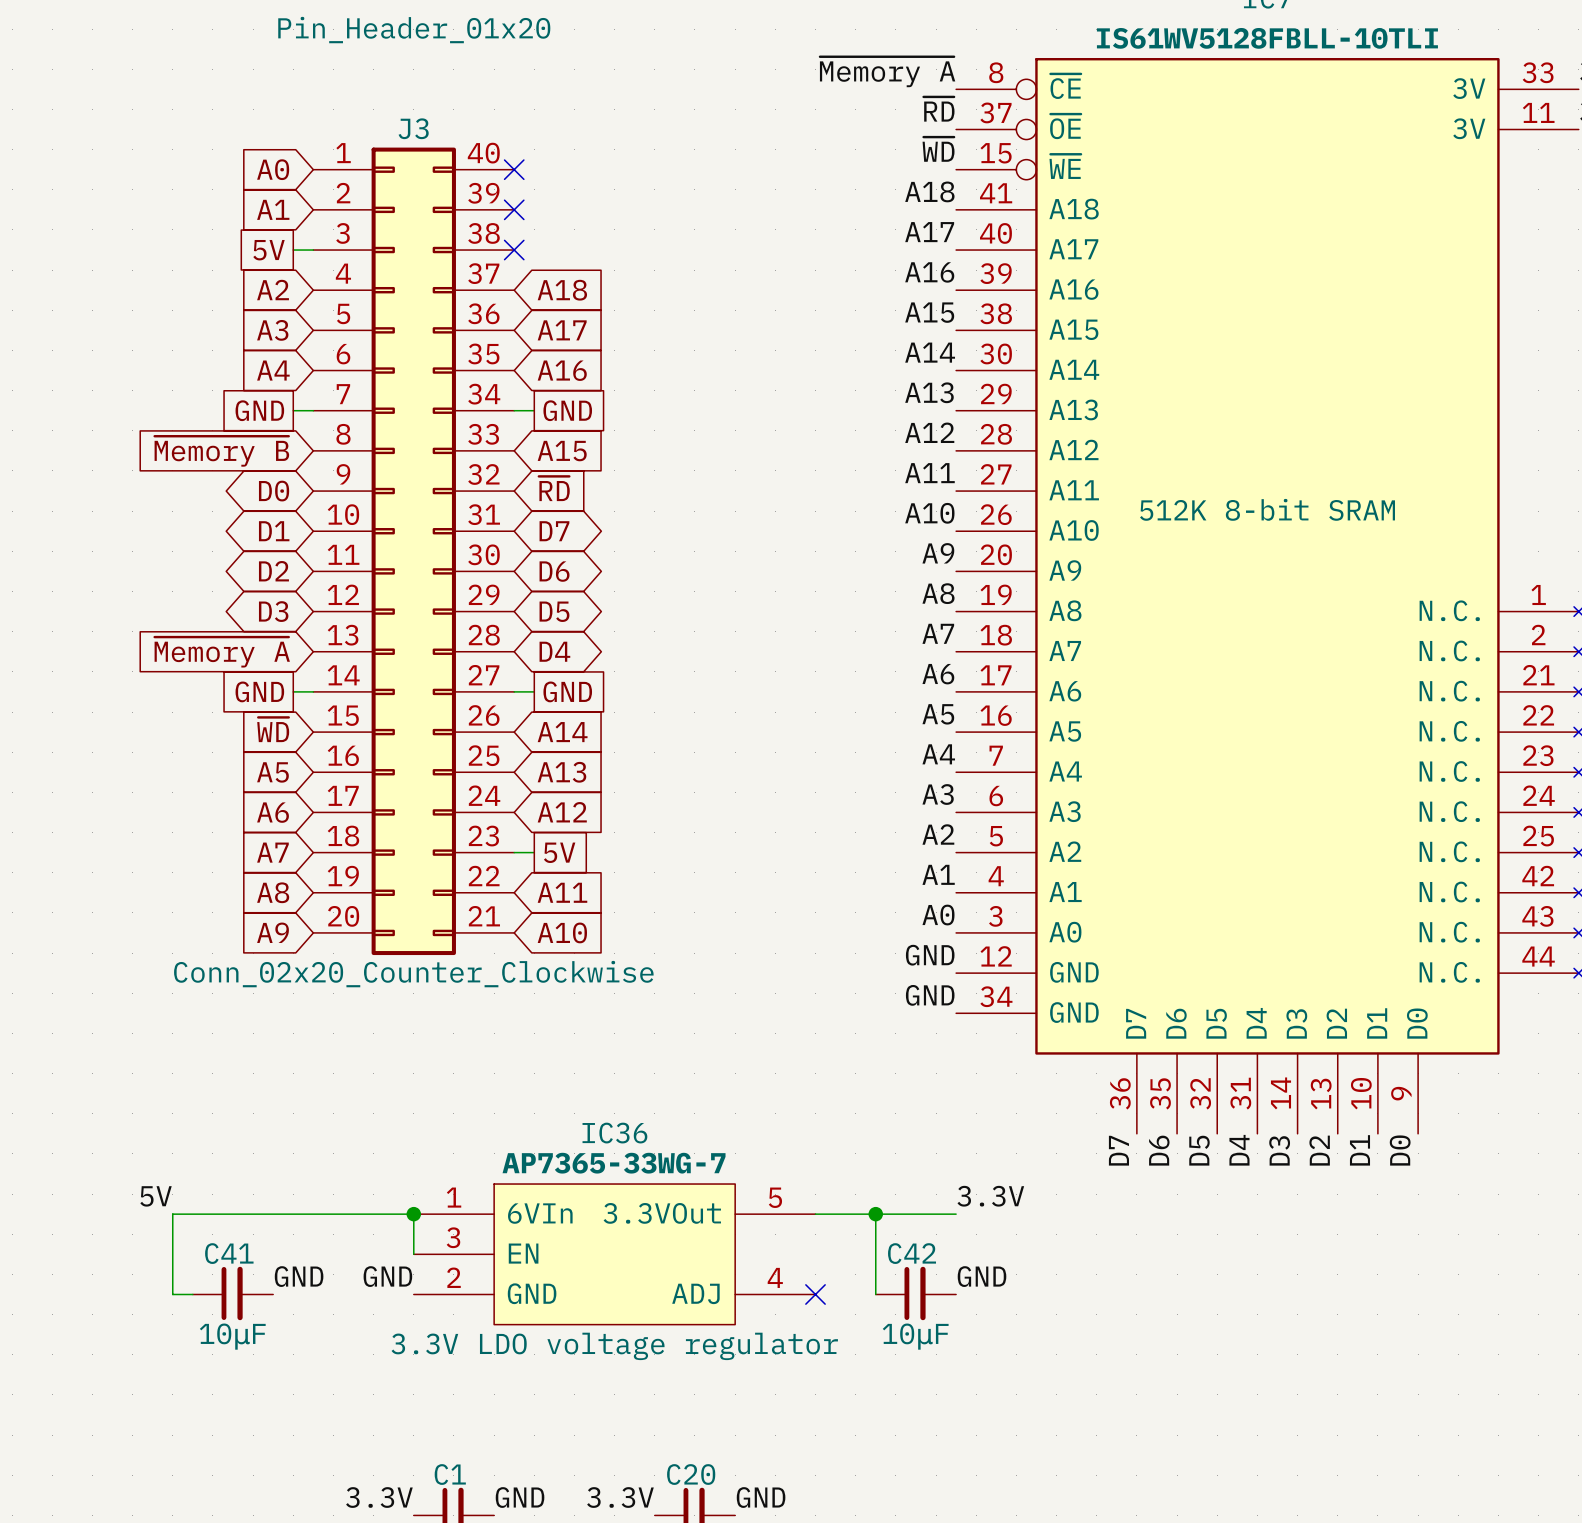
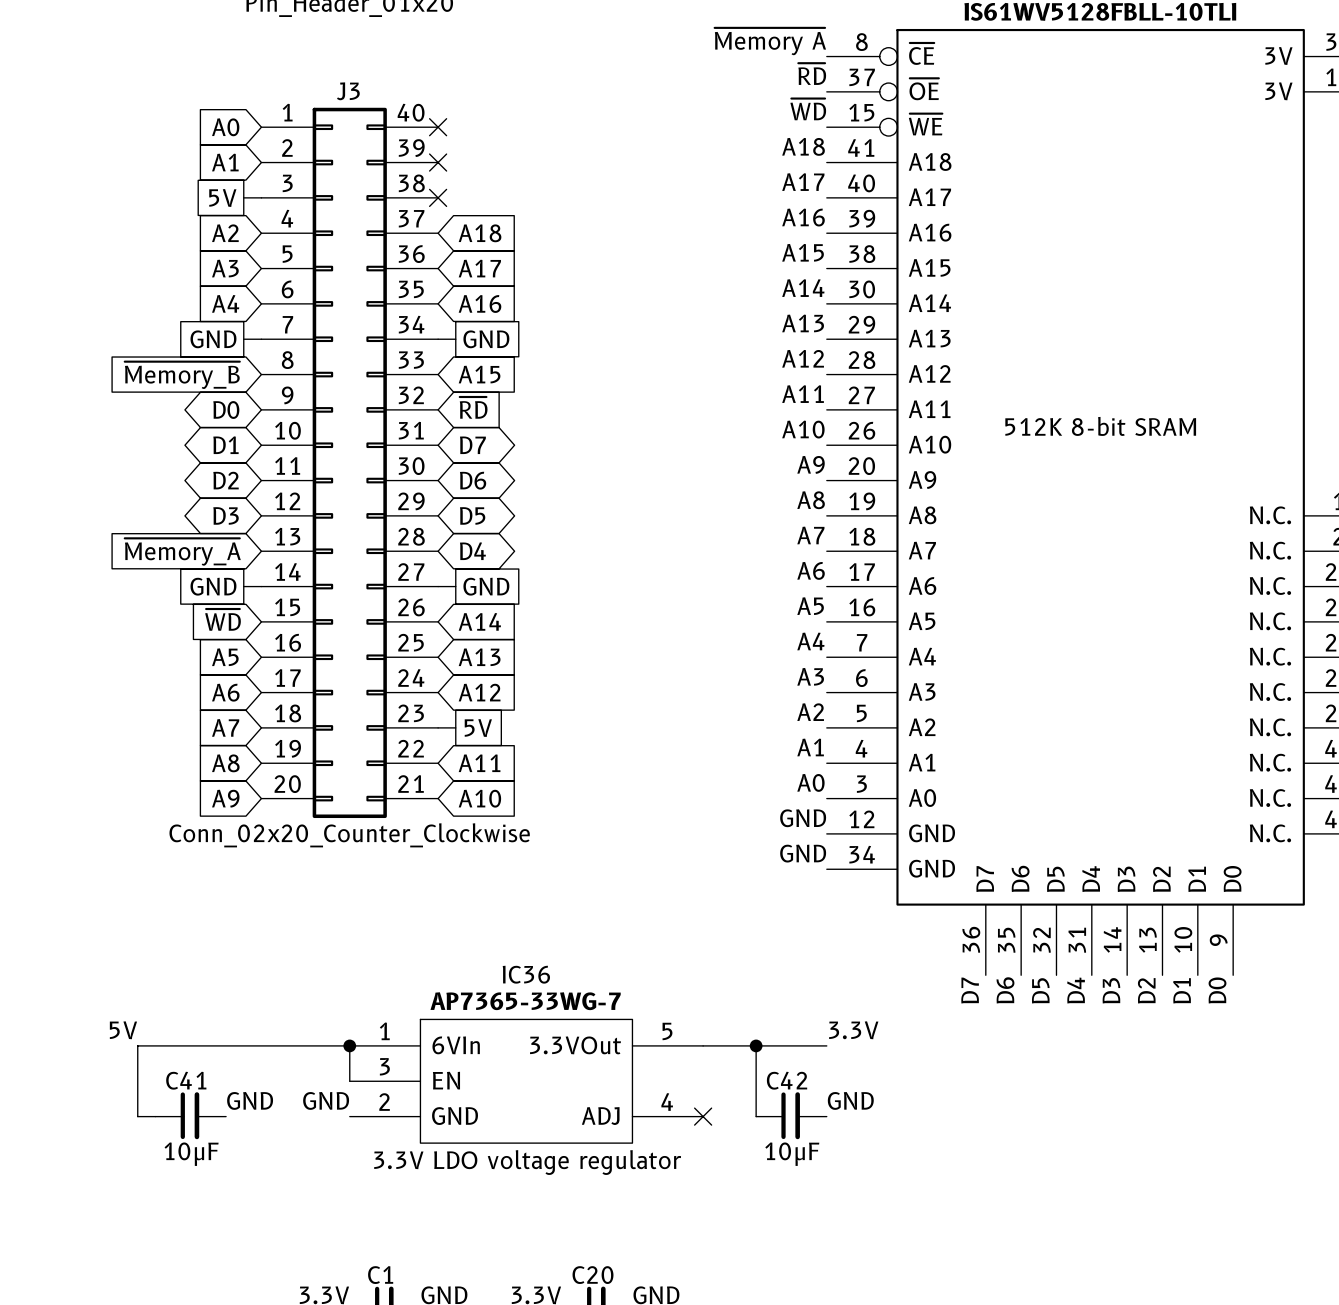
global label: ~{Memory B} (221, 451) -> ~{Memory_B} (182, 375)
global label: ~{Memory A} (222, 652) -> ~{Memory_A} (182, 551)

